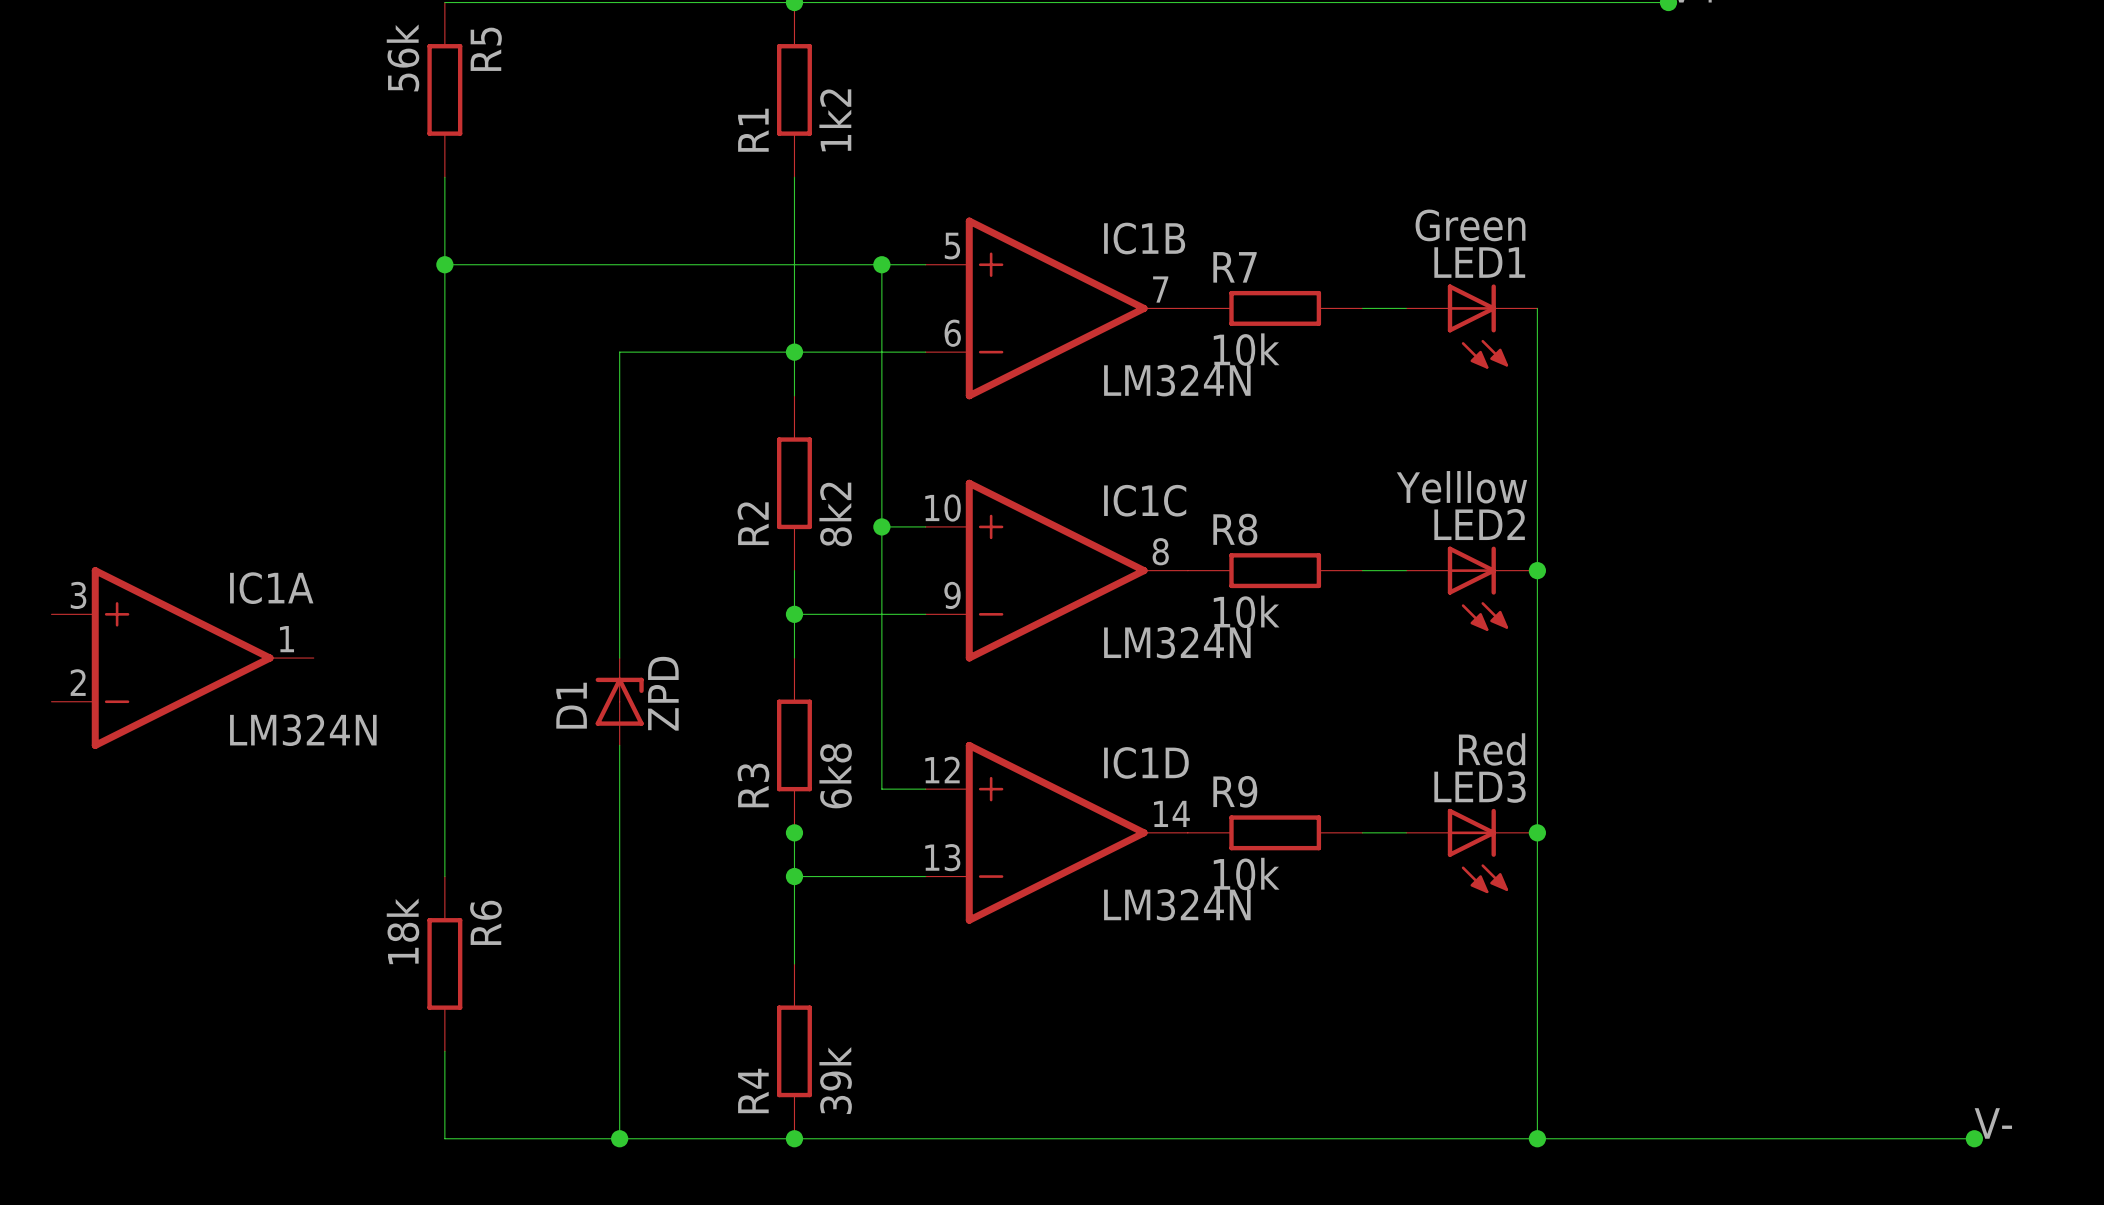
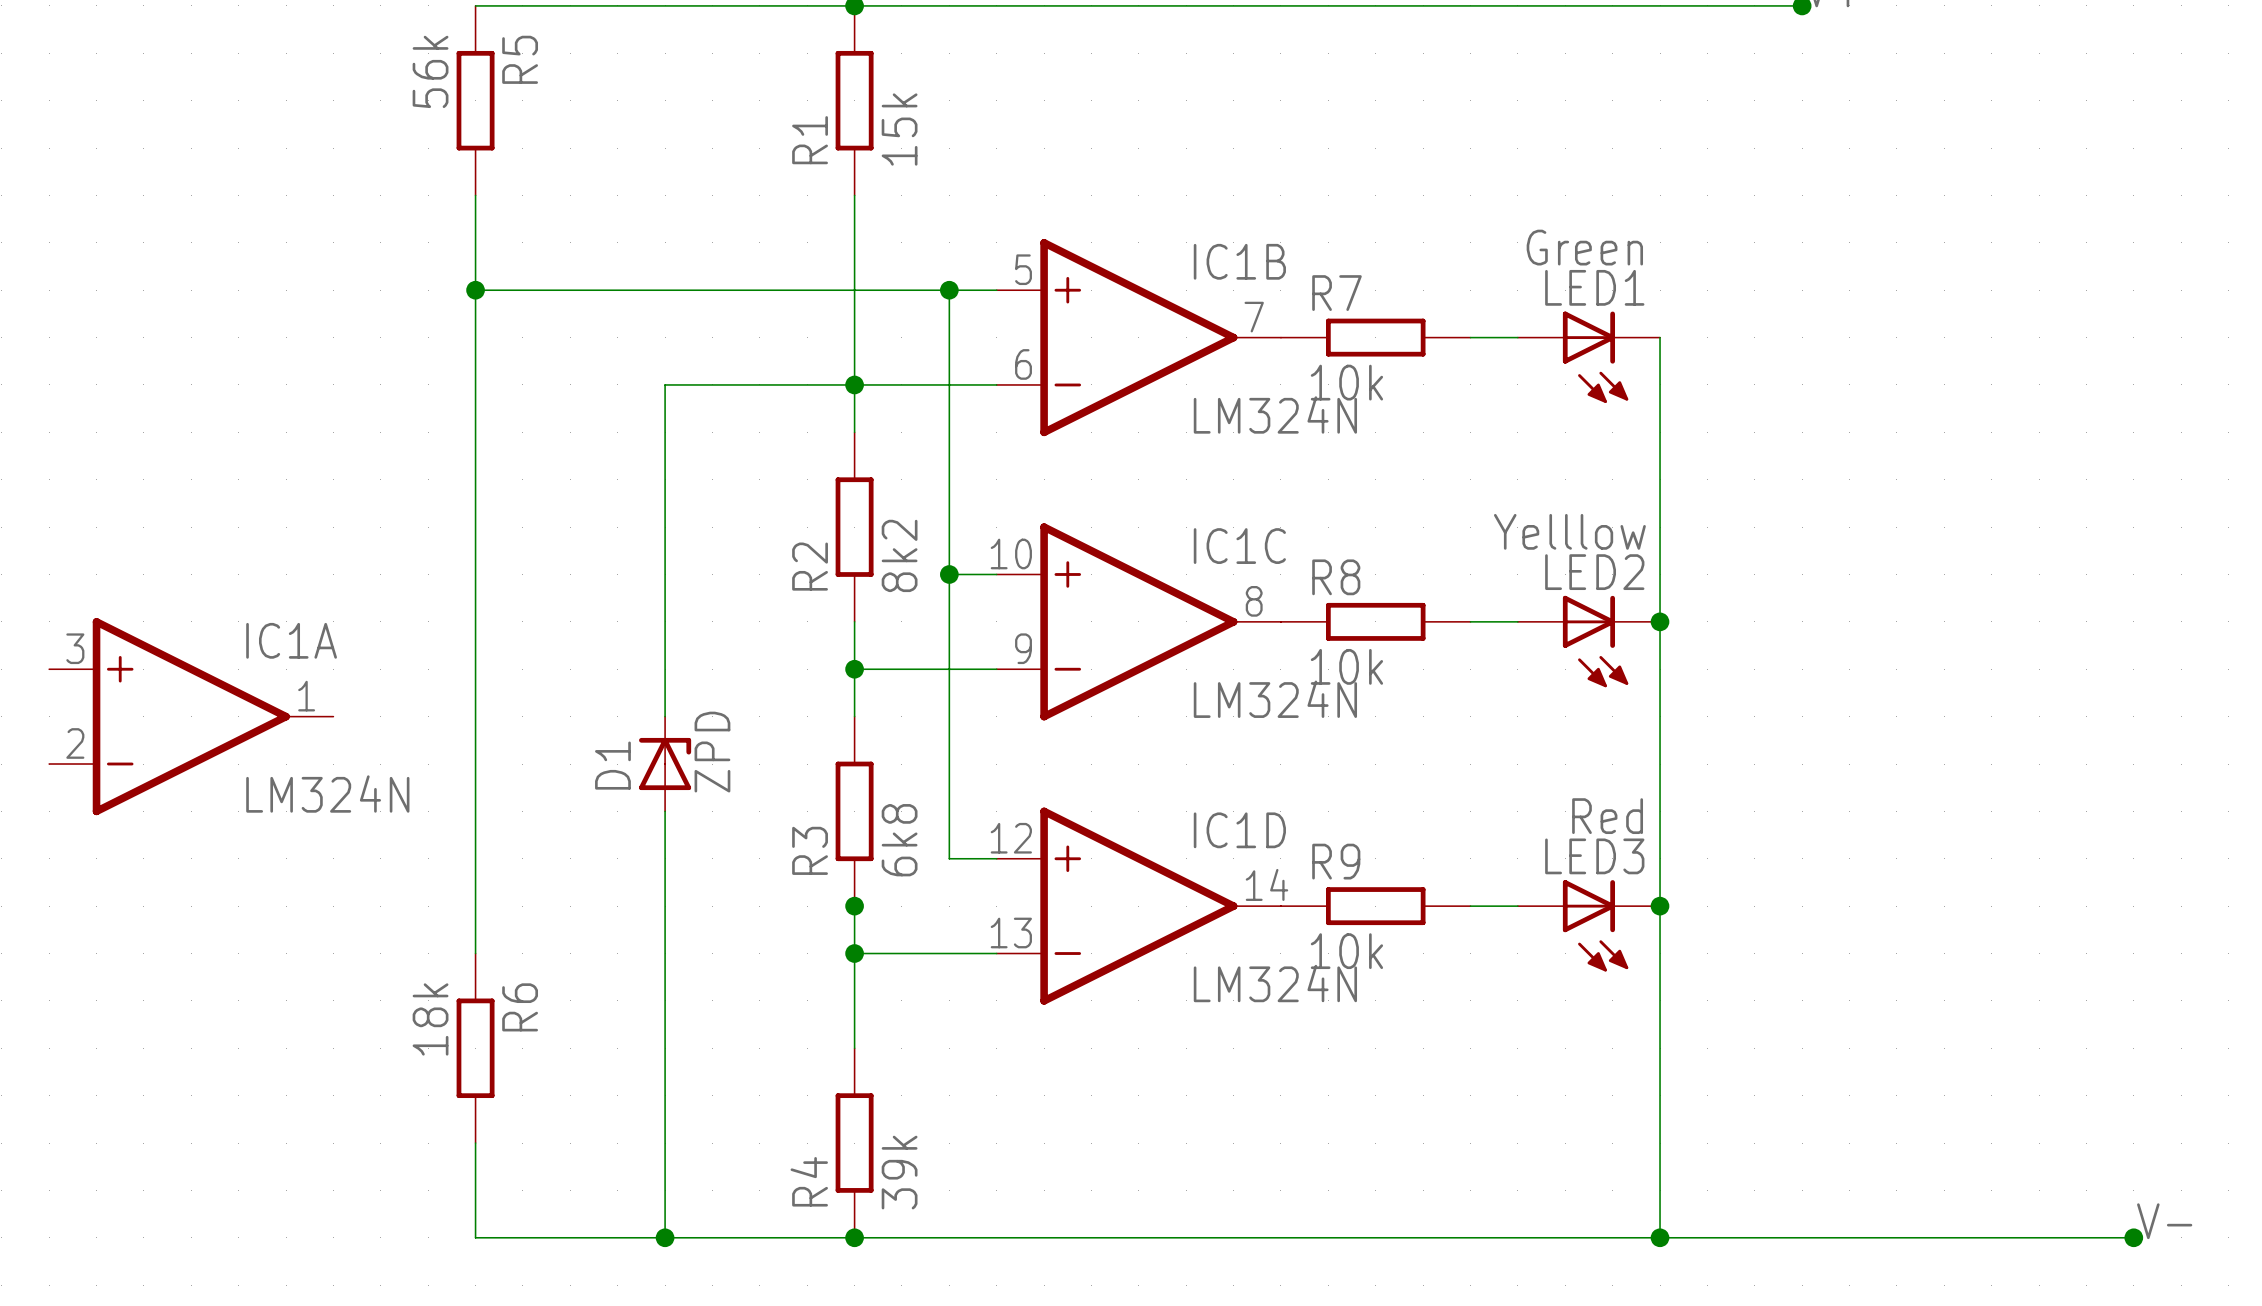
R1 value: 1k2 (835, 120) -> 15k (899, 129)

